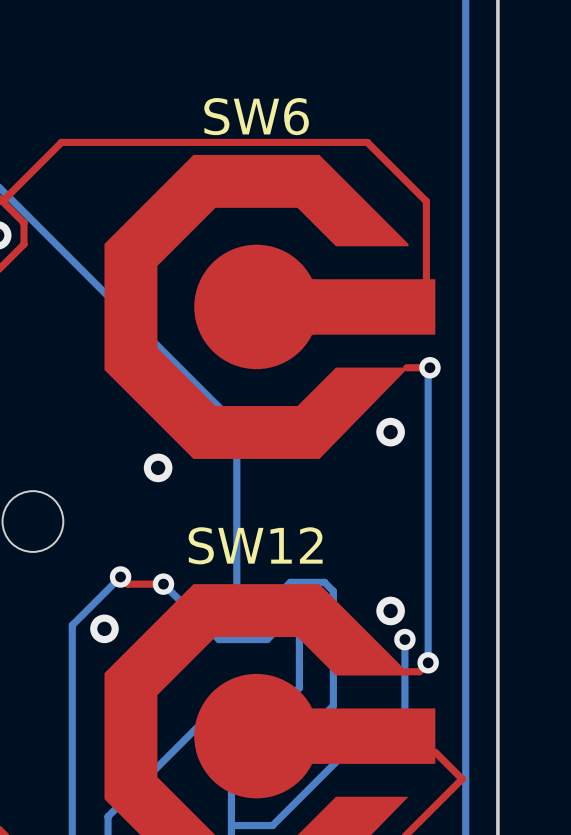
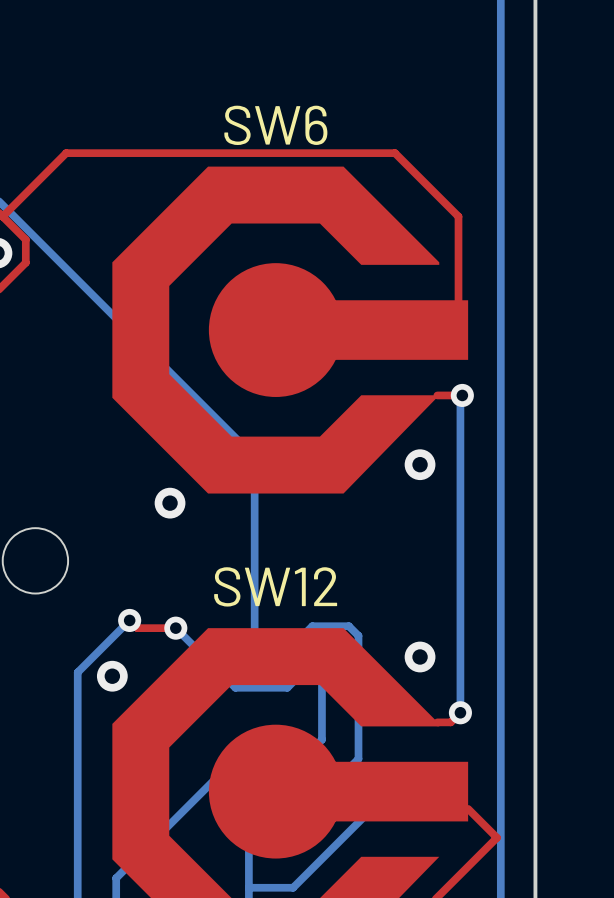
bottom track: (404, 639) (404, 712) -> none
via: (404, 639) -> none

